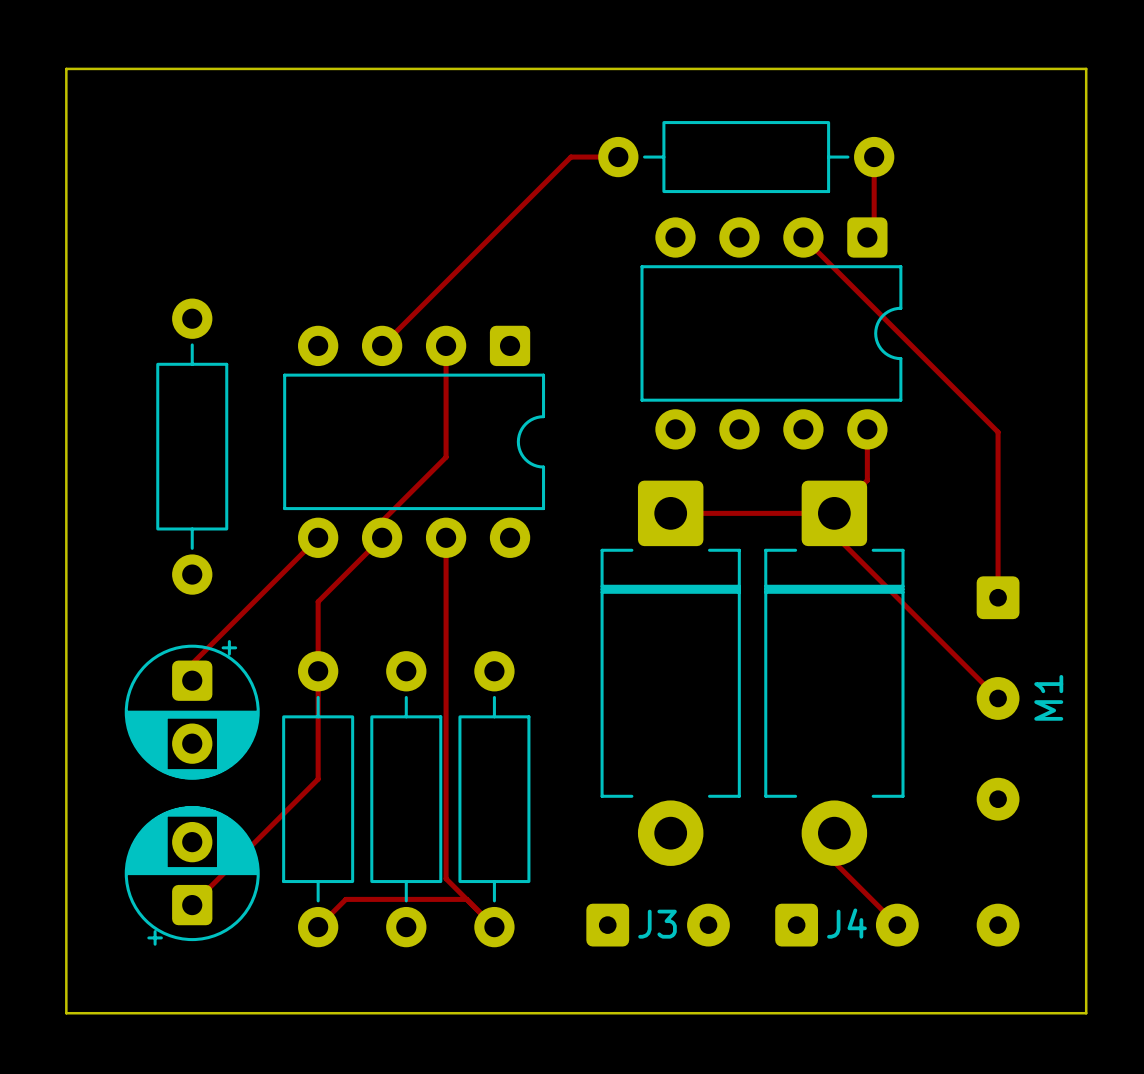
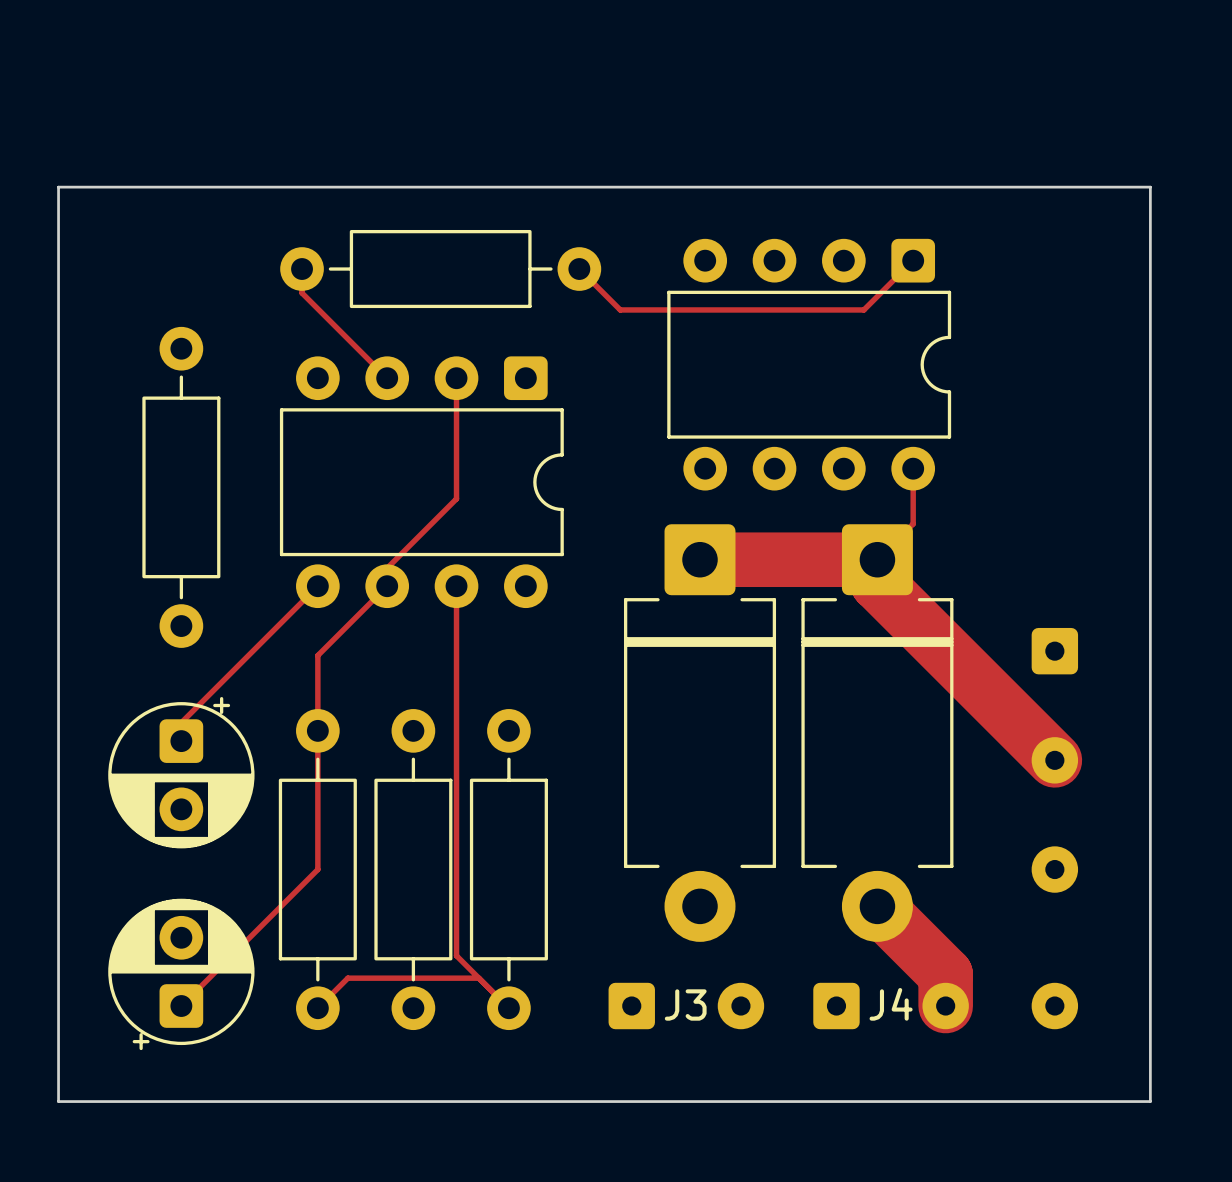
track: (618, 157) (570, 157) (382, 345) -> (302, 269) (302, 293) (387, 378)
part position: (746, 157) -> (440, 269)
track: (874, 157) (874, 230) (867, 237) -> (579, 269) (620, 309) (863, 309) (913, 260)
board edge: (1086, 169) (1086, 68) (66, 68) (66, 1013) (78, 1013) -> (1150, 187) (58, 187) (58, 1101)
track: (803, 237) (998, 432) (998, 597) -> none
track width: thin (670, 513) (834, 513) (834, 534) (998, 698) -> thick (700, 559) (877, 559) (877, 582) (1054, 760)
M1 name: M1 (1048, 697) -> none
track: (318, 779) (192, 905) -> (317, 847) (317, 869) (181, 1006)
track: (834, 833) (834, 862) (897, 925) -> (877, 906) (945, 974) (945, 1006)
part position: (192, 875) -> (181, 974)

